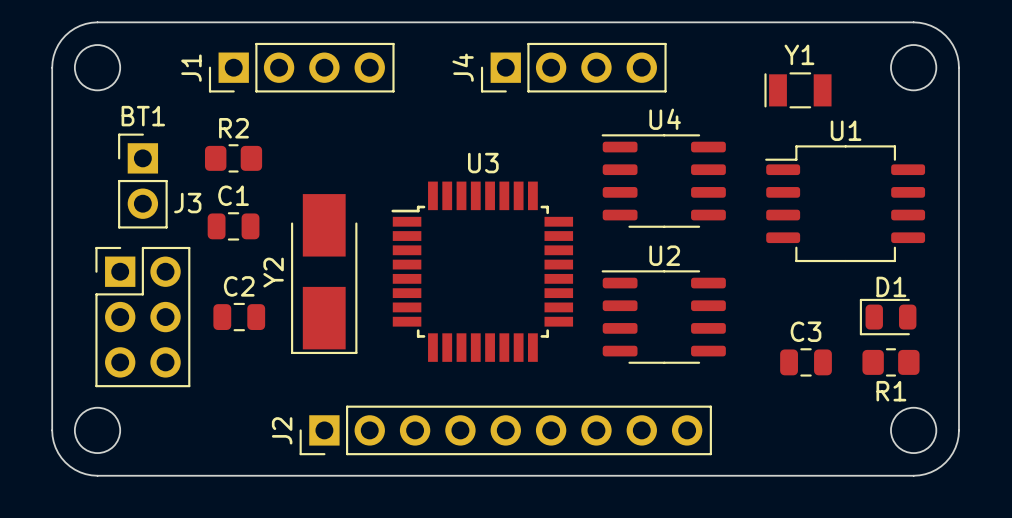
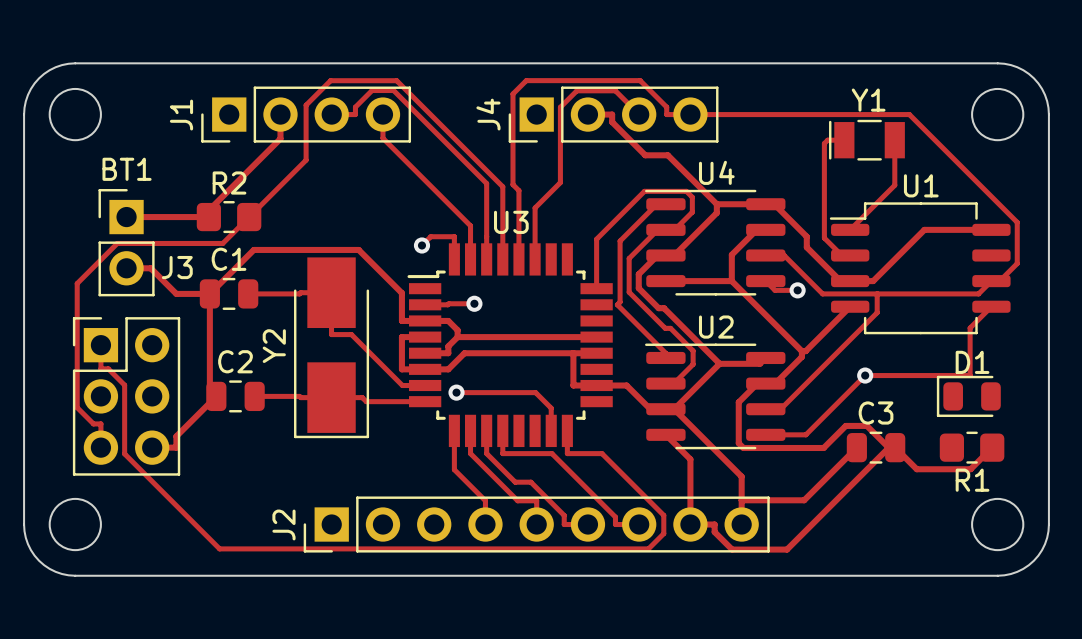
track: none -> (280, 114) (280, 138) (208, 210) (208, 217) (126, 217)
track: none -> (331, 114) (355, 114) (355, 107) (372, 90) (393, 90) (486, 183) (486, 259)
track: none -> (382, 114) (382, 138) (470, 225) (470, 259)
track: none -> (587, 114) (612, 114) (612, 122) (645, 155) (667, 155) (716, 204)
track: none -> (639, 114) (615, 90) (576, 90) (560, 107) (560, 182) (535, 207) (535, 259)
track: none -> (844, 140) (827, 140) (824, 143) (824, 238) (841, 255) (850, 255)
track: none -> (894, 140) (894, 185) (850, 229)
track: none -> (665, 204) (656, 204) (620, 241) (620, 302) (617, 304) (665, 353) (665, 357)
track: none -> (716, 204) (774, 204) (806, 236) (806, 247) (840, 281) (873, 281) (924, 229) (991, 229)
track: none -> (716, 204) (716, 212) (674, 255) (657, 255) (638, 274) (638, 288) (658, 308) (664, 308) (719, 363)
track: none -> (765, 229) (756, 229) (731, 254) (731, 281)
track: none -> (421, 245) (430, 236) (454, 236) (454, 259)
via: none -> (421, 245)
track: none -> (765, 255) (784, 255) (822, 293) (978, 293) (991, 281) (999, 281) (1017, 263) (1017, 222) (909, 114) (666, 114) (666, 107) (640, 80) (526, 80) (512, 93) (512, 184) (518, 190) (518, 259)
track: none -> (502, 259) (502, 186) (396, 80) (330, 80) (306, 105) (306, 160) (222, 243) (117, 243) (77, 283) (77, 407) (93, 423) (100, 423) (100, 447)
track: none -> (126, 268) (150, 268) (176, 293) (209, 293)
track: none -> (665, 281) (731, 281)
track: none -> (731, 281) (801, 351)
track: none -> (765, 281) (775, 290) (797, 290)
track: none -> (596, 288) (596, 239) (644, 191) (686, 191) (692, 197) (692, 212) (674, 229) (657, 229) (629, 258) (629, 292) (665, 328) (670, 328) (693, 350) (693, 364) (673, 383) (665, 383)
via: none -> (797, 290)
track: none -> (209, 293) (253, 249) (358, 249) (401, 293) (401, 320) (448, 320) (457, 330) (457, 337)
track: none -> (209, 293) (209, 389) (216, 396) (176, 436) (176, 447) (152, 447)
track: none -> (248, 293) (331, 292) (331, 334) (351, 334) (402, 385) (425, 385)
track: none -> (877, 293) (877, 312) (780, 409) (765, 409)
track: none -> (474, 303) (425, 304)
via: none -> (474, 303)
track: none -> (850, 306) (805, 351) (801, 351)
track: none -> (991, 306) (970, 328) (970, 375) (865, 375) (805, 434) (765, 434)
track: none -> (425, 337) (401, 337) (401, 369) (448, 369) (464, 353) (596, 353)
track: none -> (457, 337) (596, 337)
track: none -> (457, 337) (448, 346) (448, 353) (425, 353)
track: none -> (100, 345) (100, 368) (108, 368) (124, 385) (124, 453) (219, 548) (648, 548) (663, 533) (663, 515) (602, 453) (567, 453) (567, 430)
track: none -> (801, 351) (801, 356) (775, 383) (757, 383) (738, 402) (738, 443) (743, 447) (823, 447) (845, 425) (866, 425) (888, 447)
track: none -> (573, 353) (573, 385) (626, 385) (650, 409) (674, 409)
track: none -> (765, 357) (759, 363) (719, 363)
track: none -> (719, 363) (674, 409)
via: none -> (865, 375)
track: none -> (456, 392) (535, 392) (551, 408) (551, 430)
via: none -> (456, 392)
track: none -> (254, 396) (362, 397) (366, 401) (425, 401)
track: none -> (674, 409) (741, 476) (741, 524)
track: none -> (454, 430) (454, 469) (485, 500) (485, 524)
track: none -> (470, 430) (470, 453) (517, 500) (536, 500) (536, 524)
track: none -> (486, 430) (486, 453) (515, 482) (530, 482) (564, 515) (564, 524) (587, 524)
track: none -> (502, 430) (502, 453) (551, 453) (615, 517) (615, 524) (639, 524)
track: none -> (665, 434) (690, 459) (690, 524) (714, 524) (714, 532) (732, 549) (787, 549) (888, 447)
track: none -> (856, 447) (804, 500) (741, 500)
track: none -> (895, 447) (916, 469) (970, 469) (992, 447)

